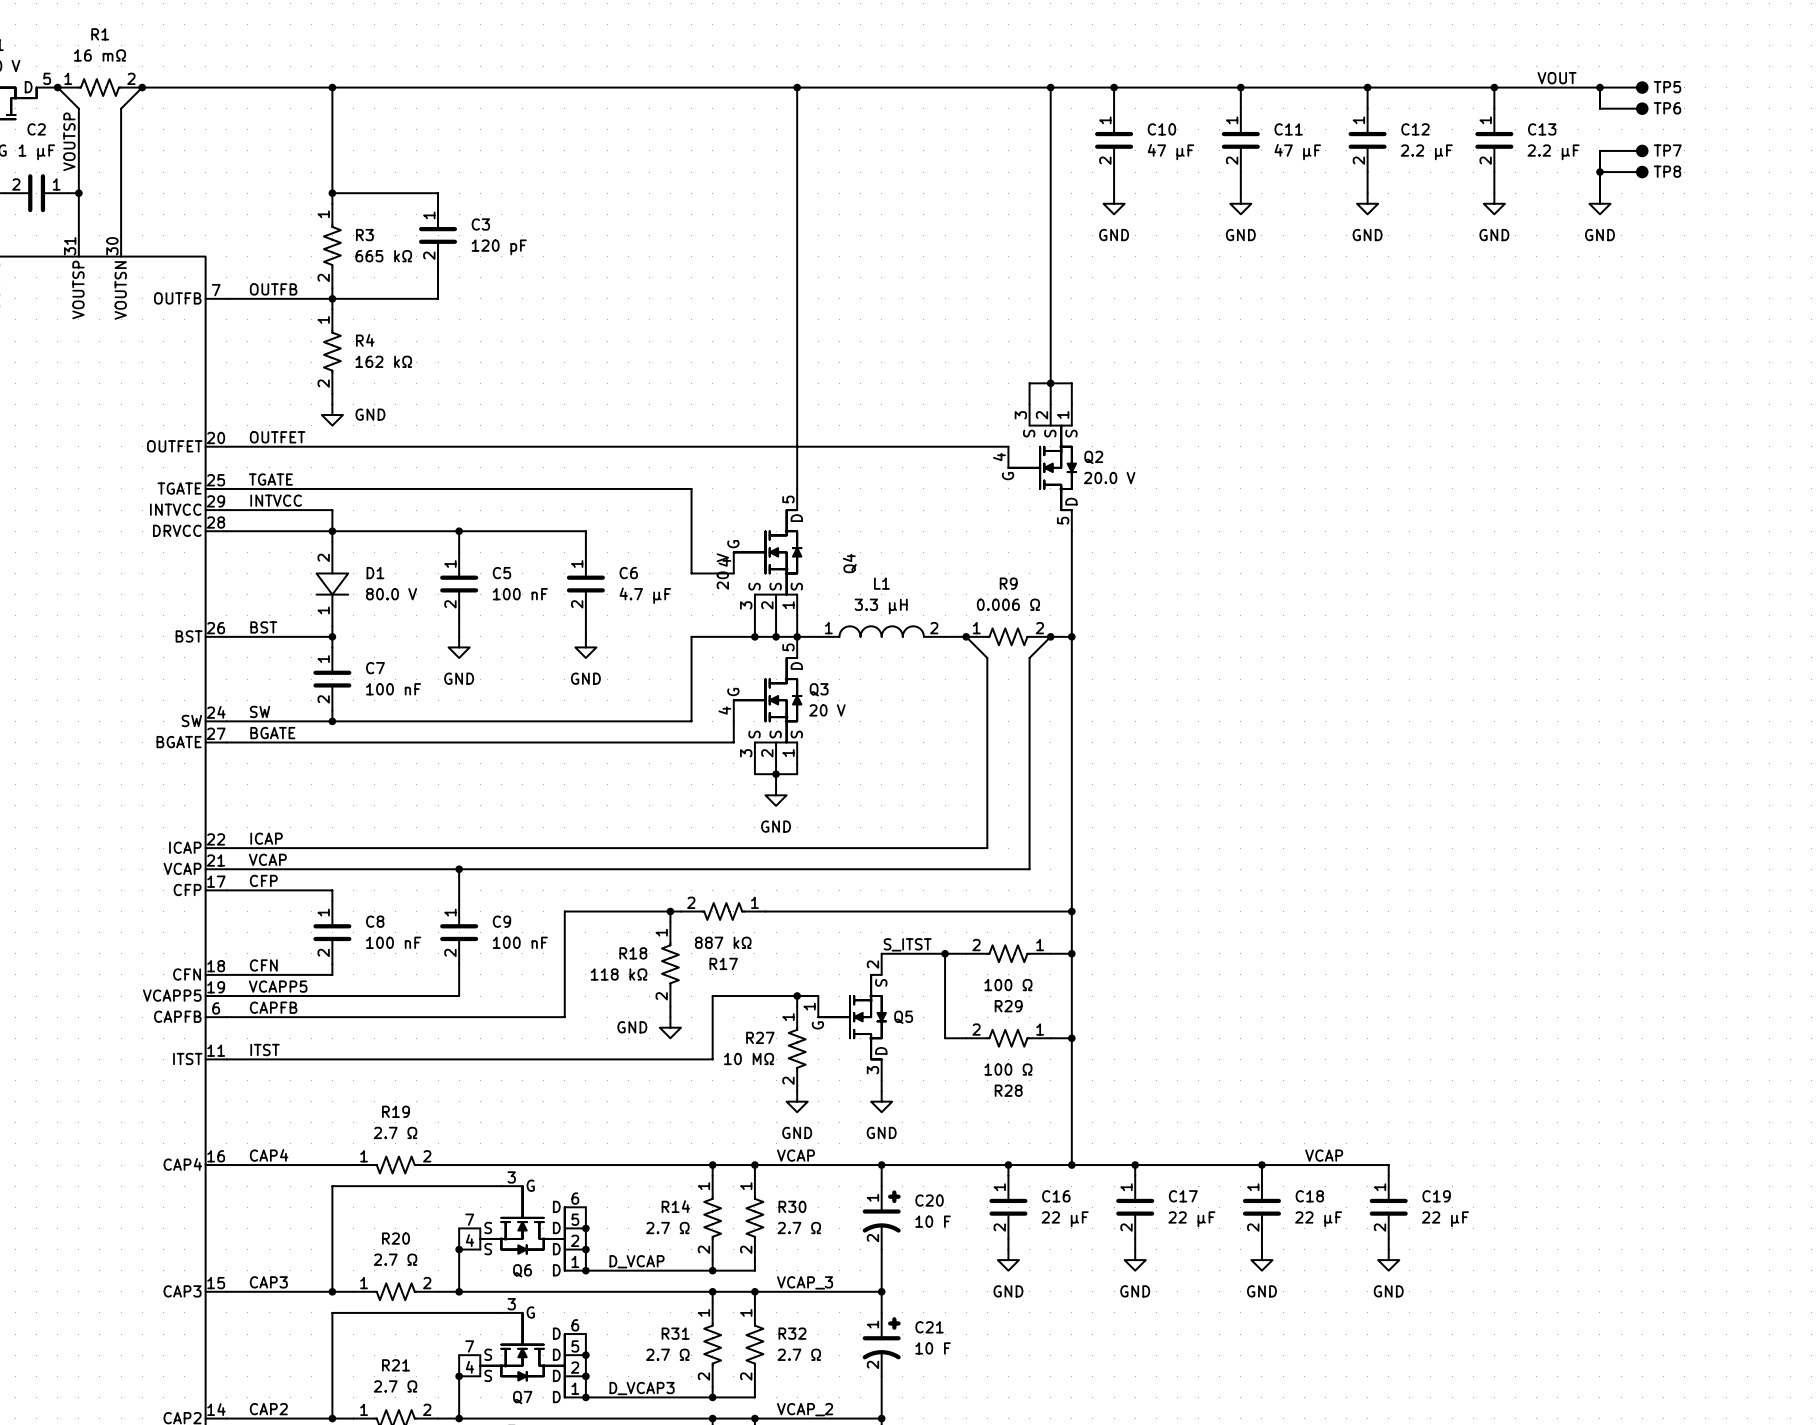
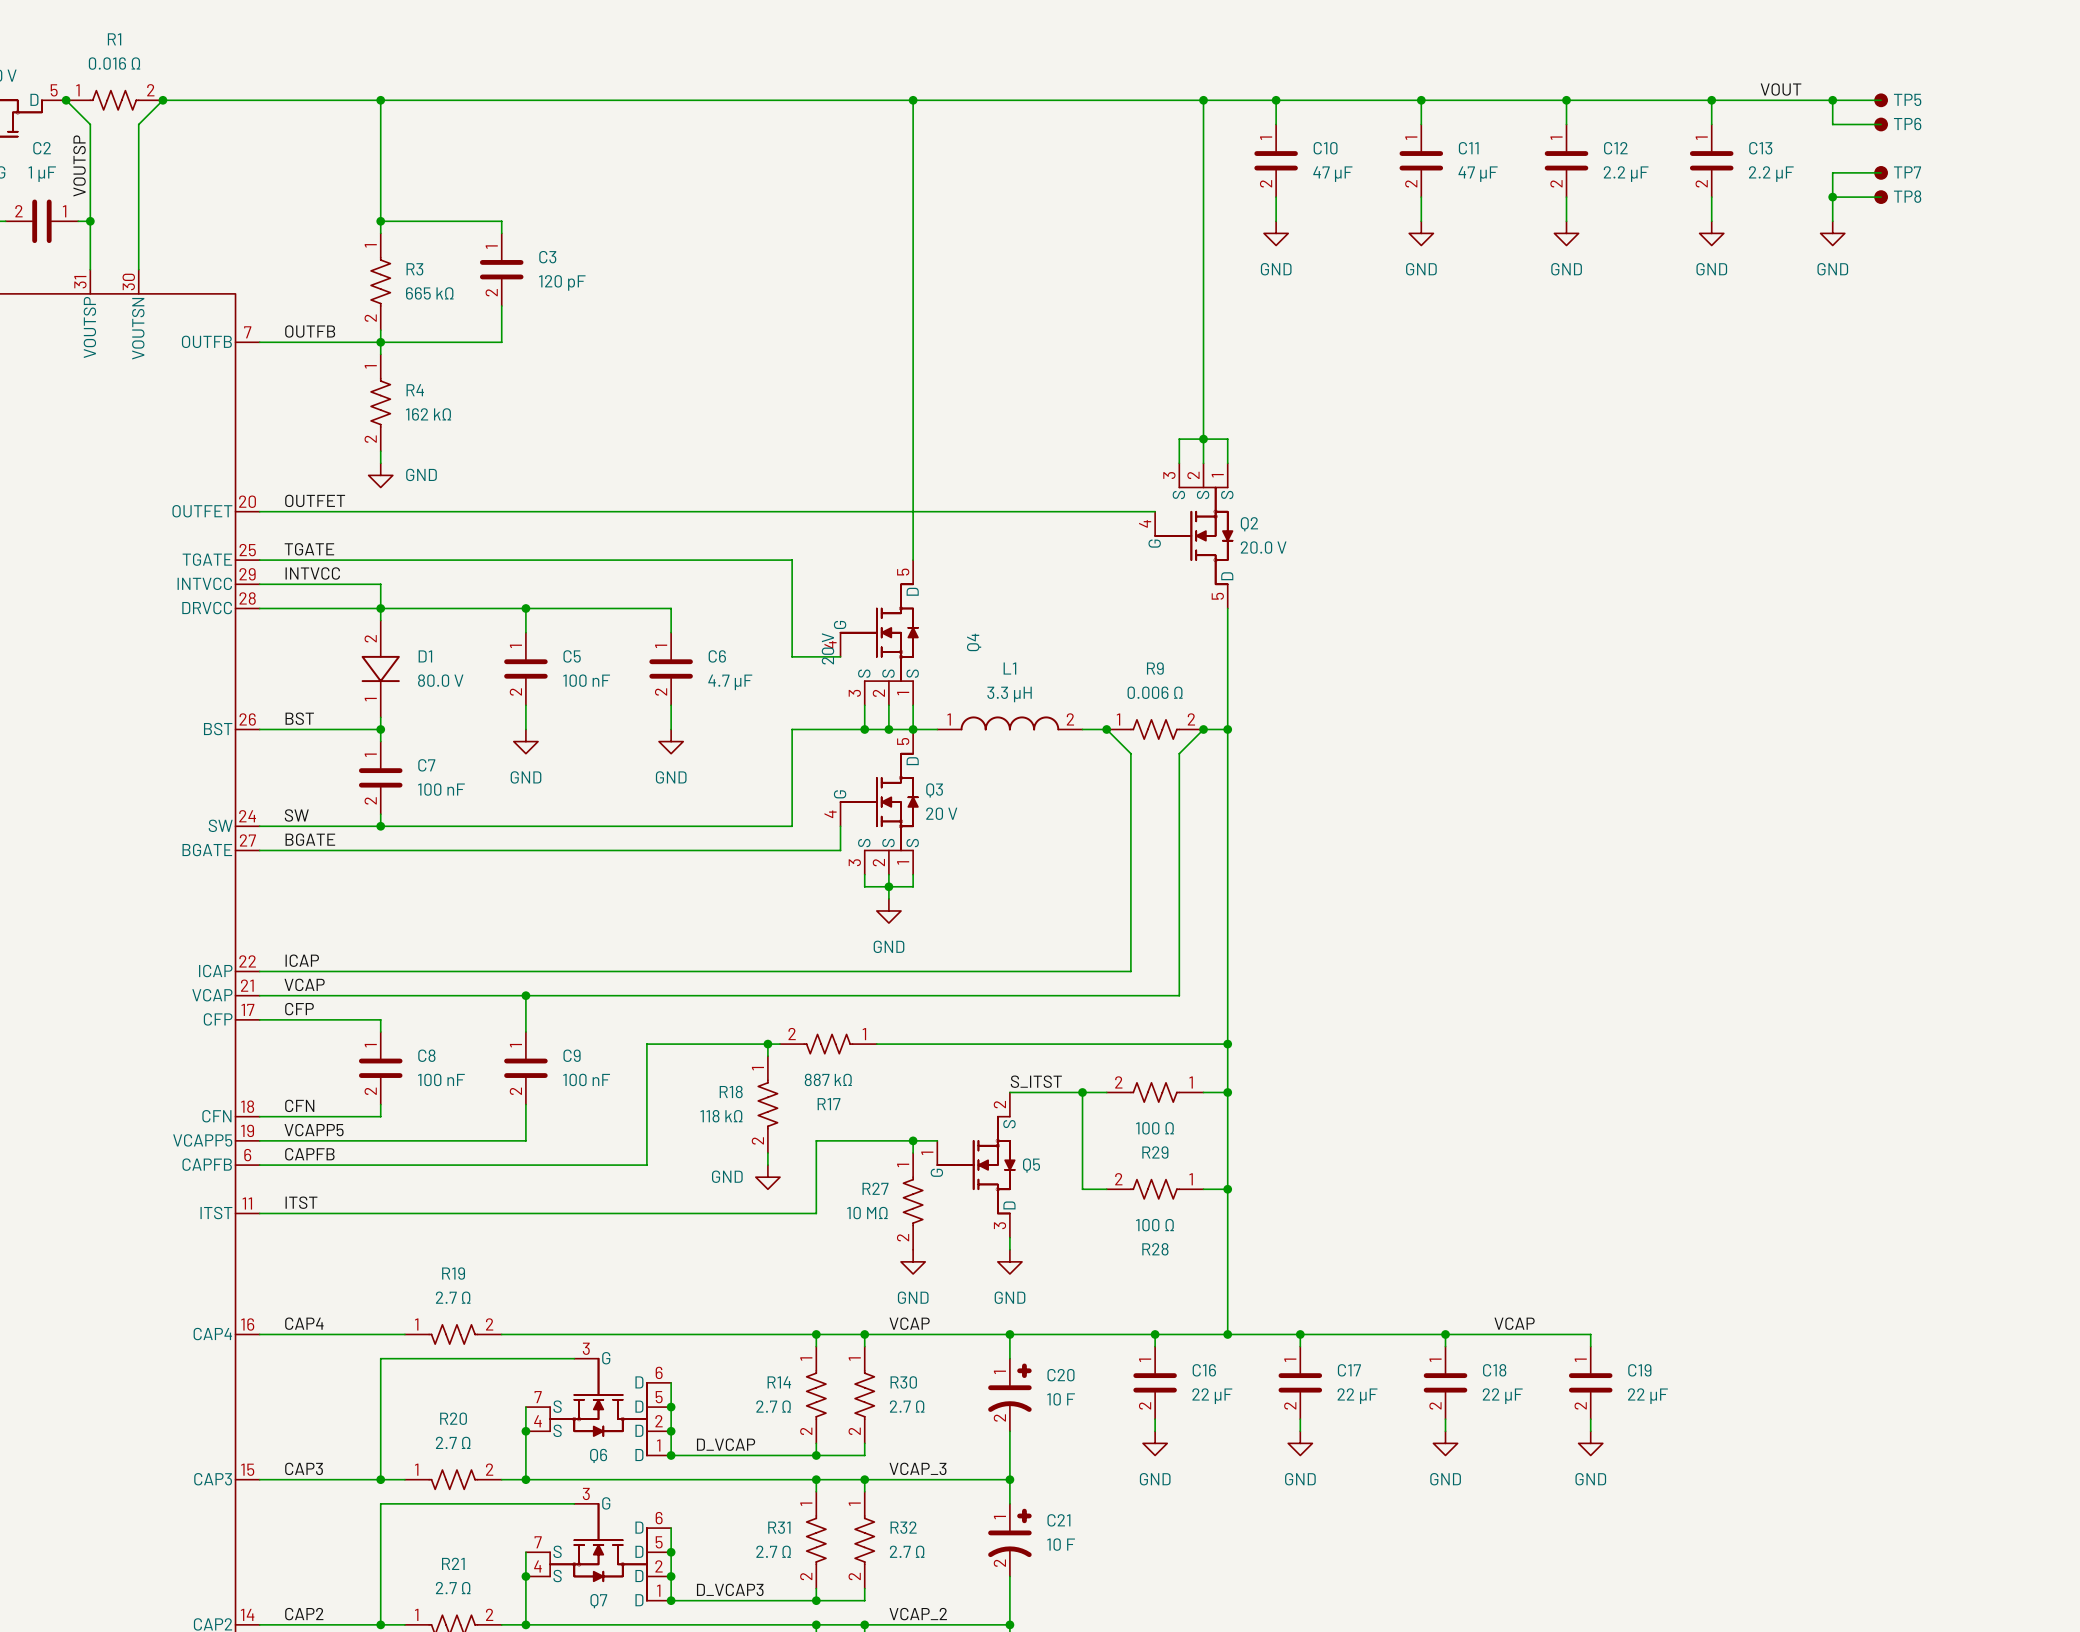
R1 value: 16 mΩ (99, 55) -> 0.016 Ω (114, 63)

